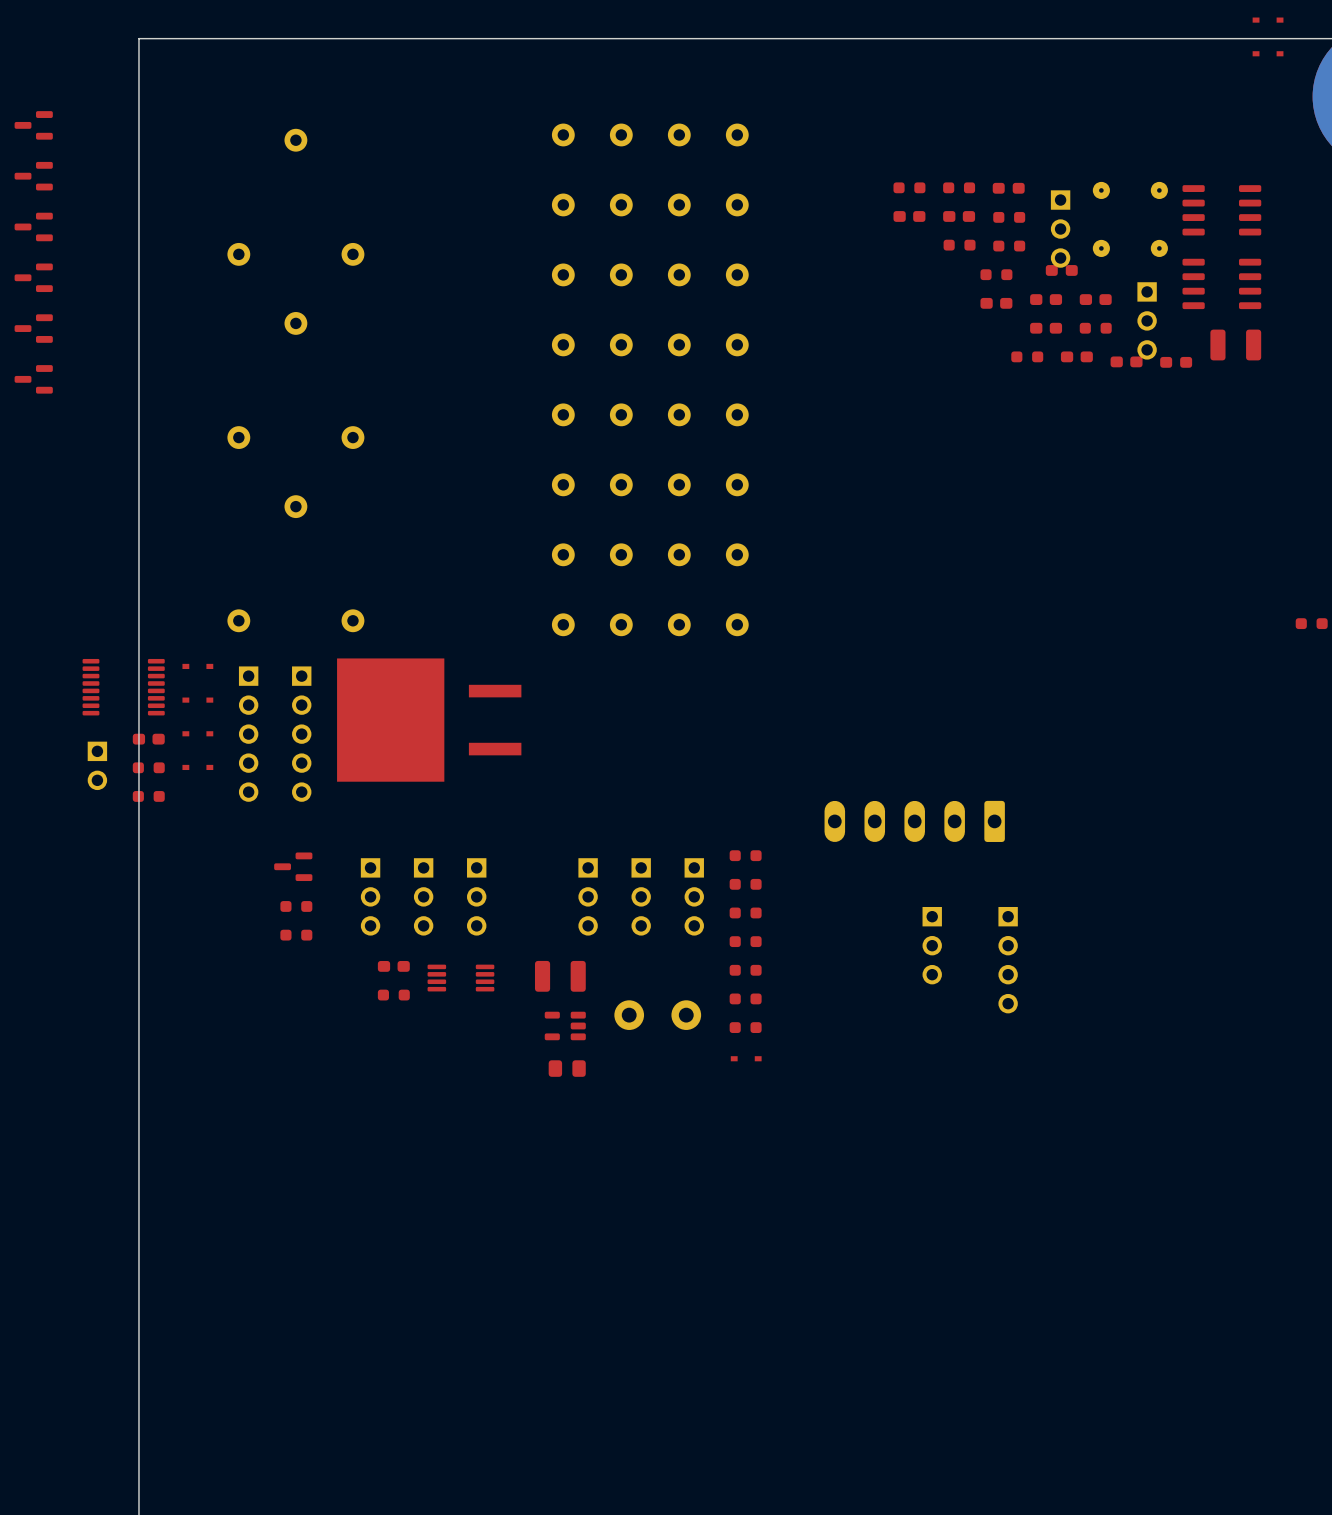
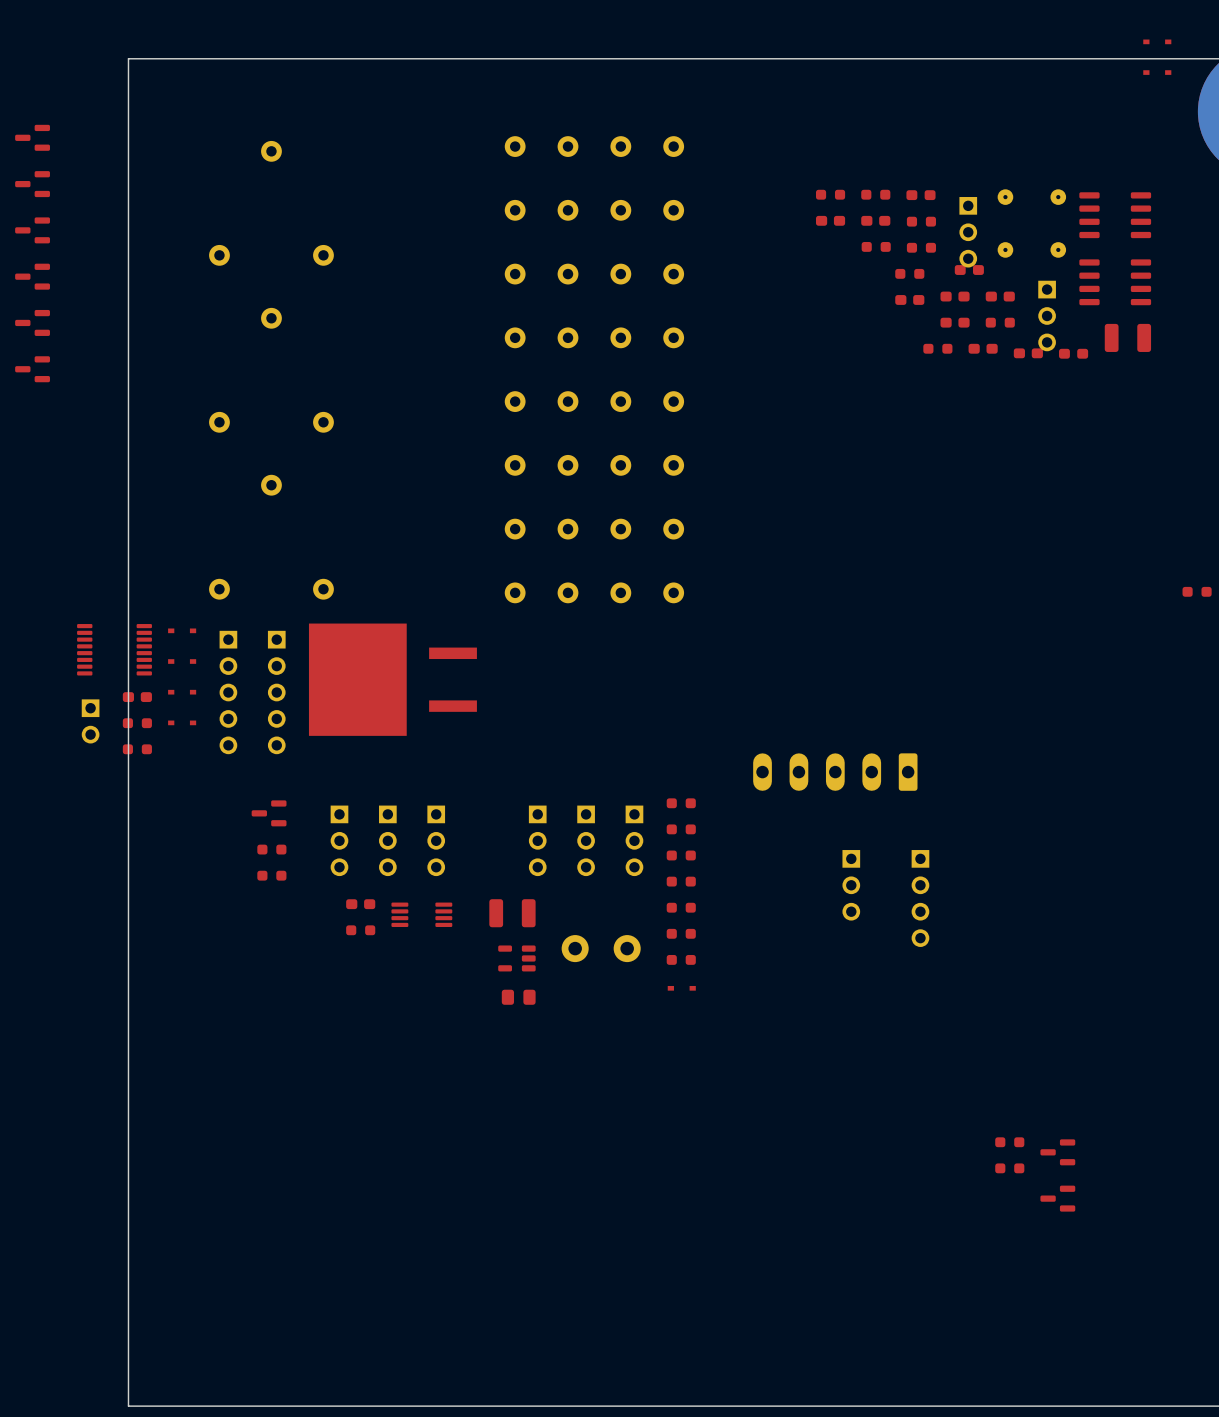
part: none -> (1009, 1142)
part: none -> (1057, 1152)
part: none -> (1009, 1168)
part: none -> (1057, 1198)

